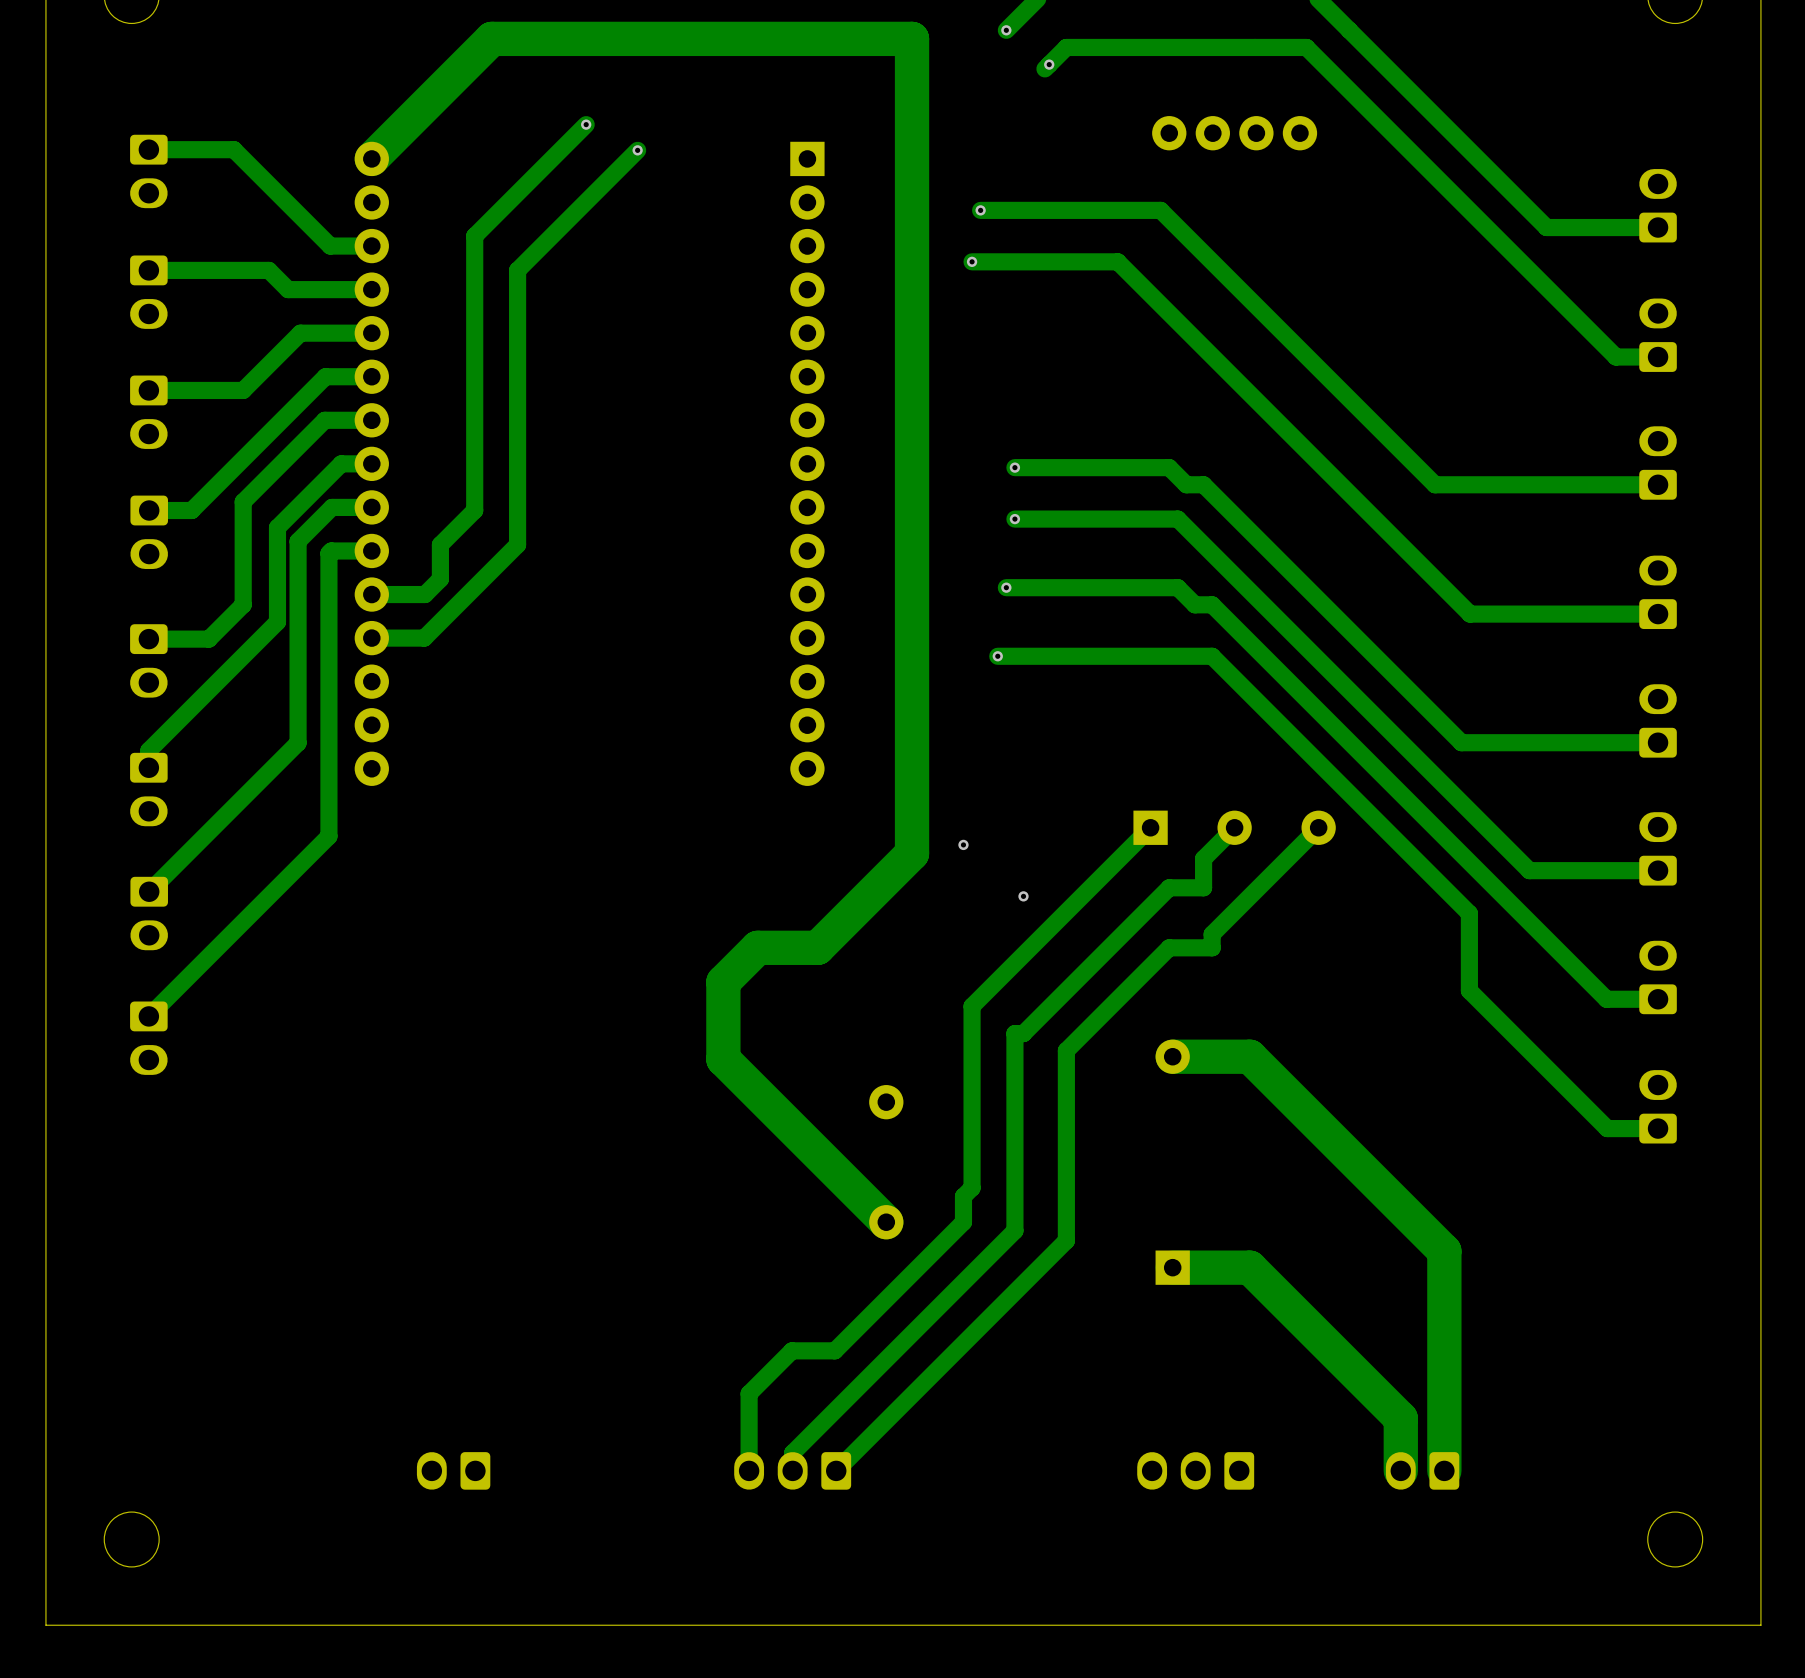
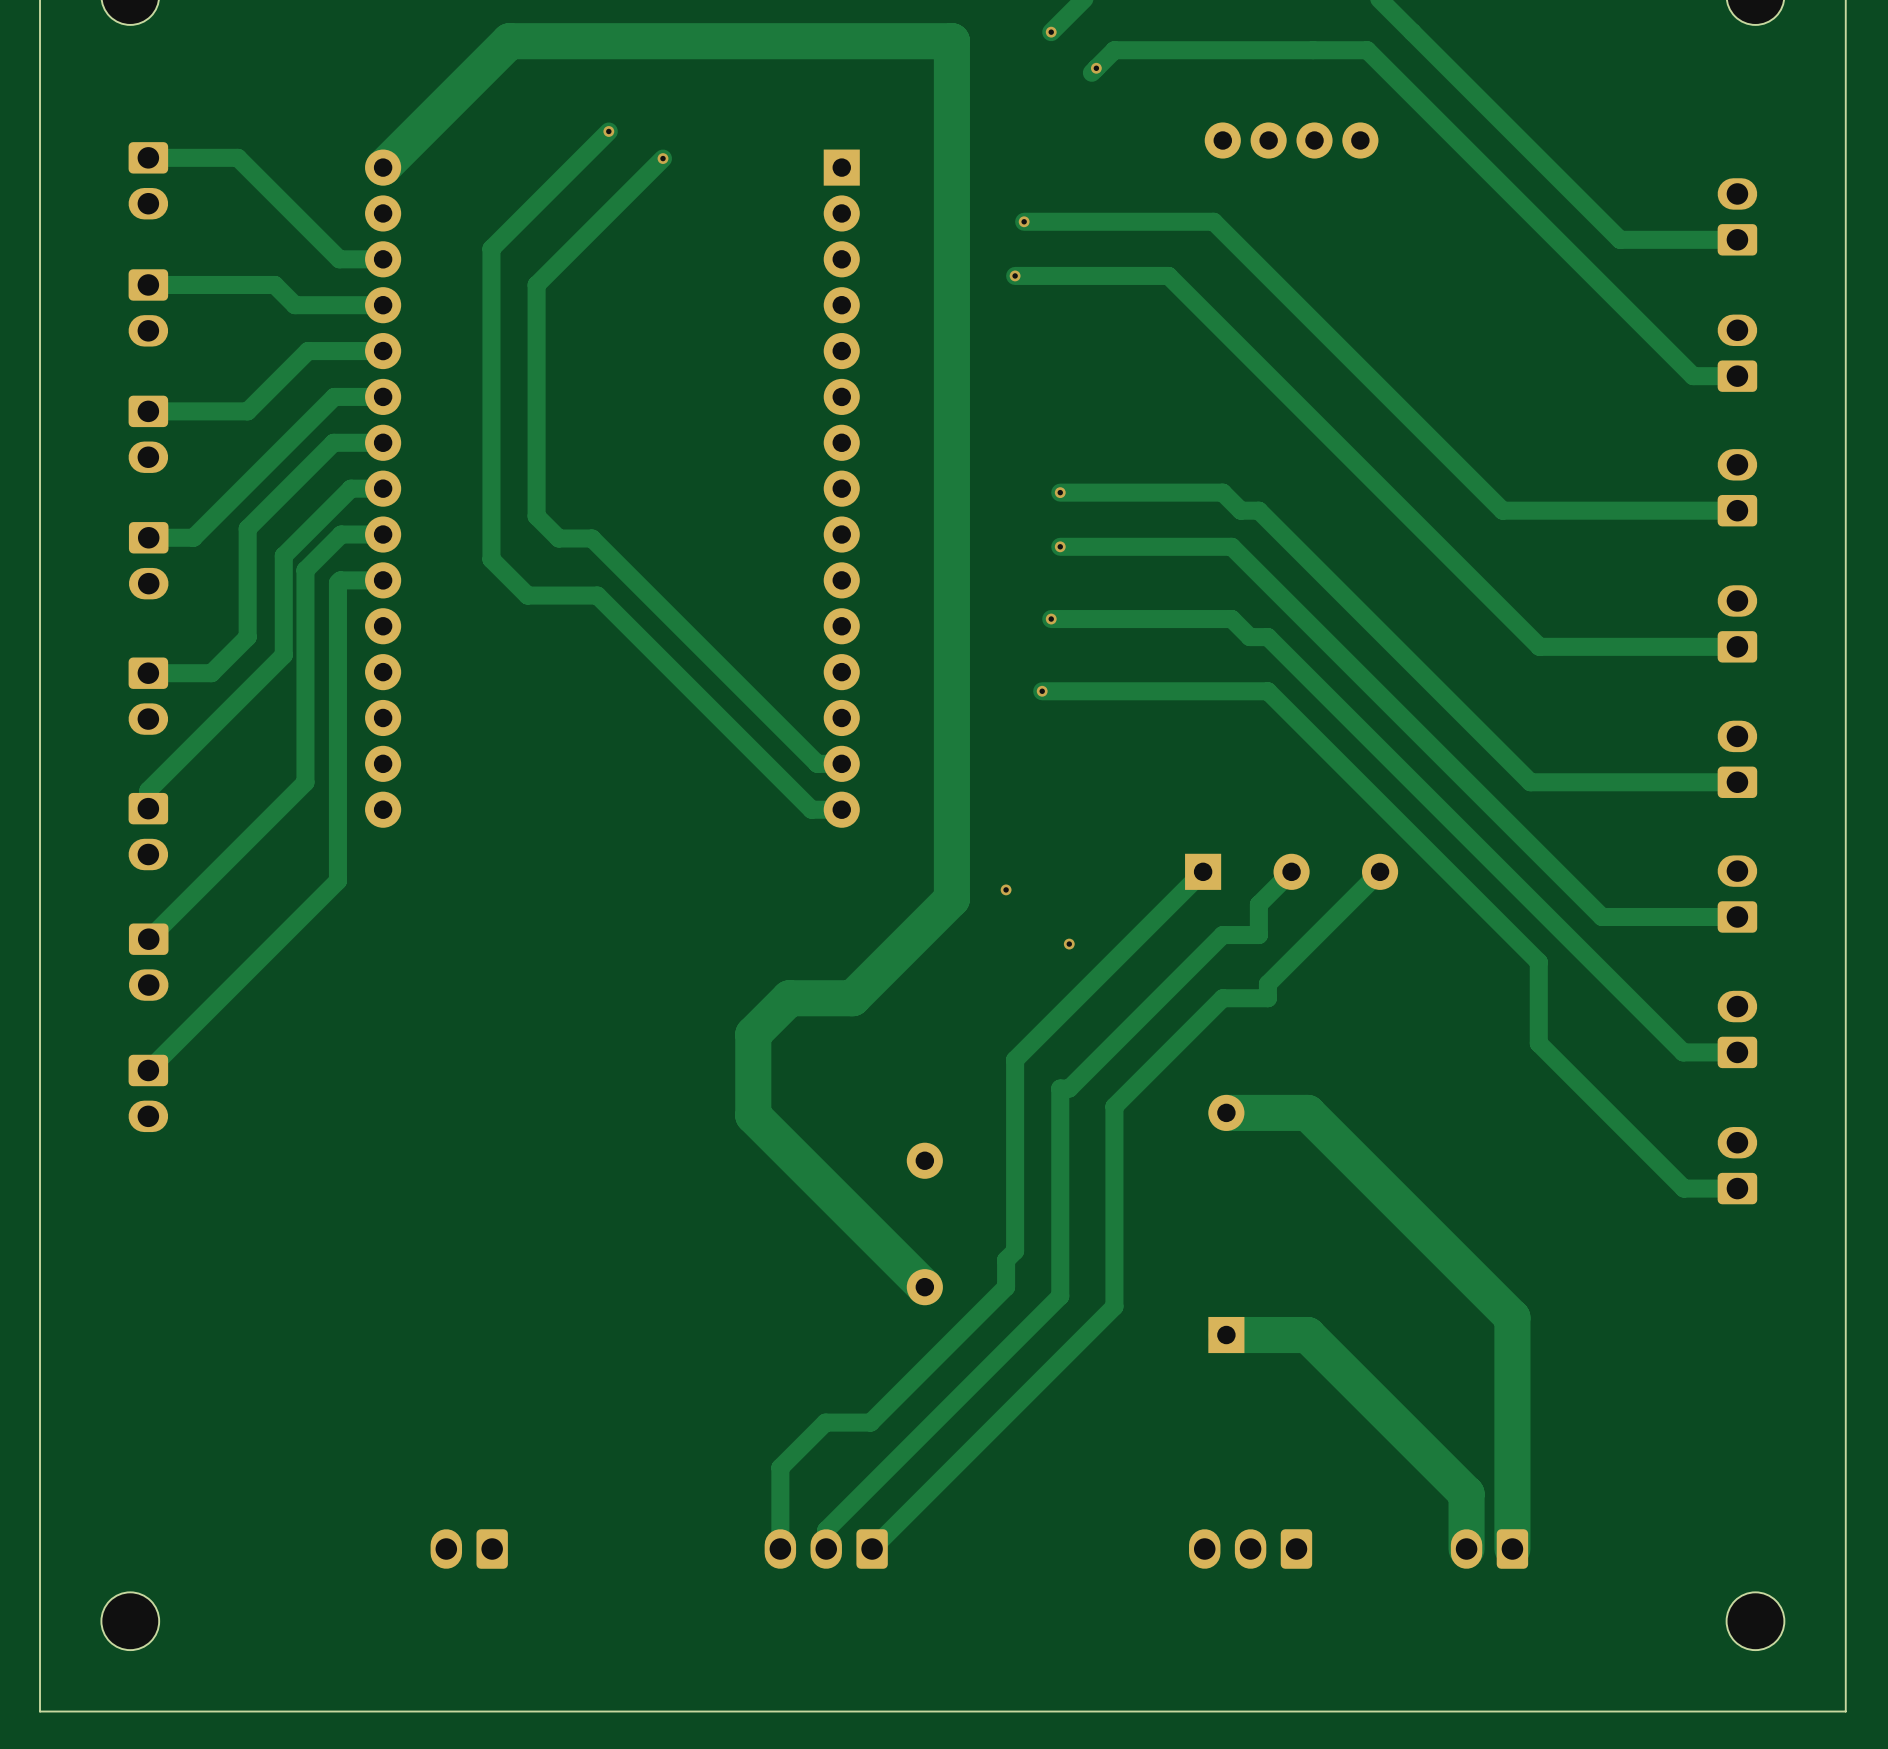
track: (517, 490) (517, 544) (424, 638) (371, 638) -> (536, 516) (558, 538) (592, 538) (817, 763) (841, 763)
track: (474, 510) (440, 544) (440, 579) (424, 594) (371, 594) -> (491, 537) (491, 559) (527, 595) (597, 595) (811, 809) (841, 809)

